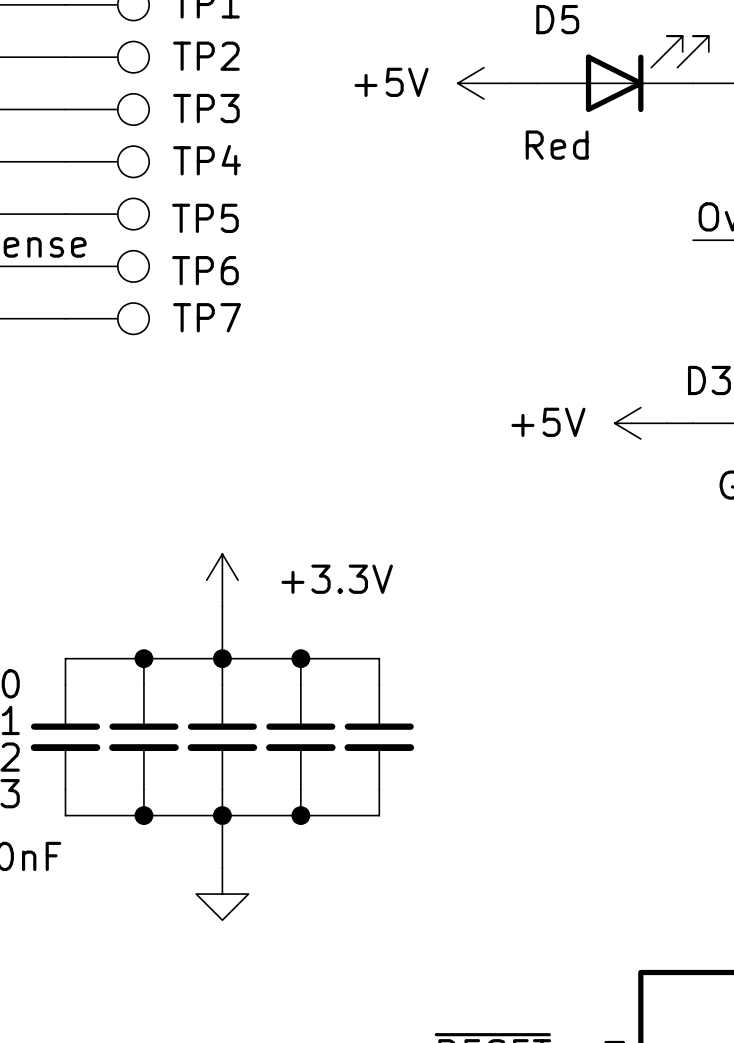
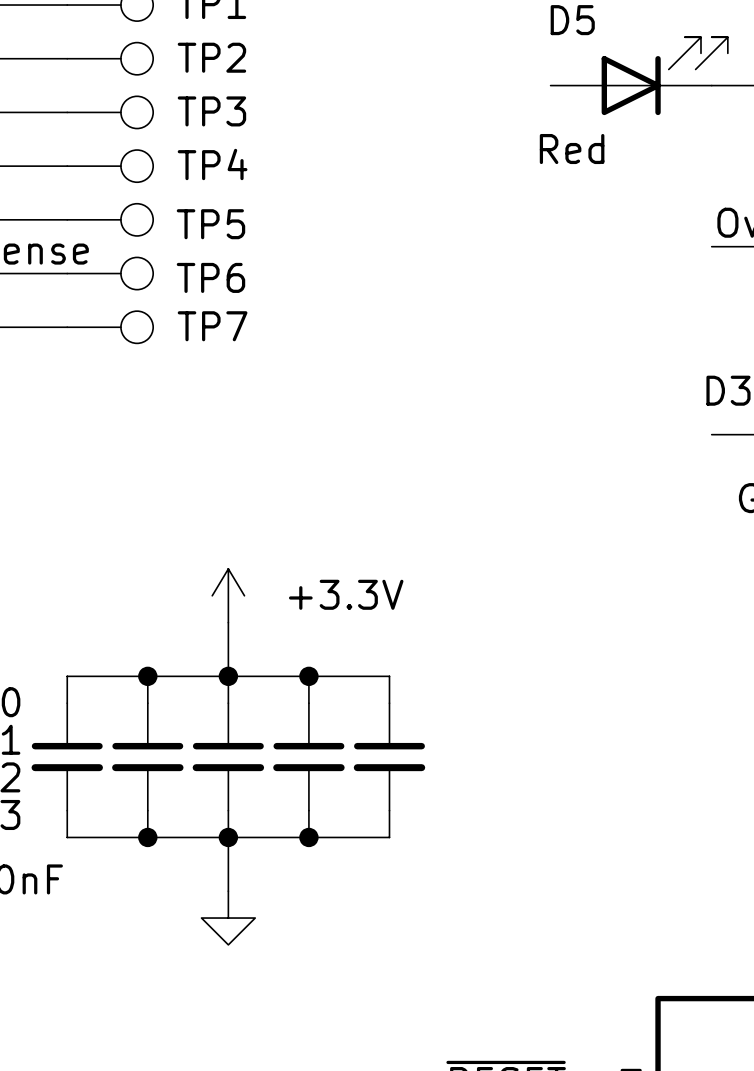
power symbol: +5V (483, 83) -> none
wire: (510, 83) (536, 83) -> none
power symbol: +5V (640, 423) -> none
wire: (666, 423) (693, 423) -> none

